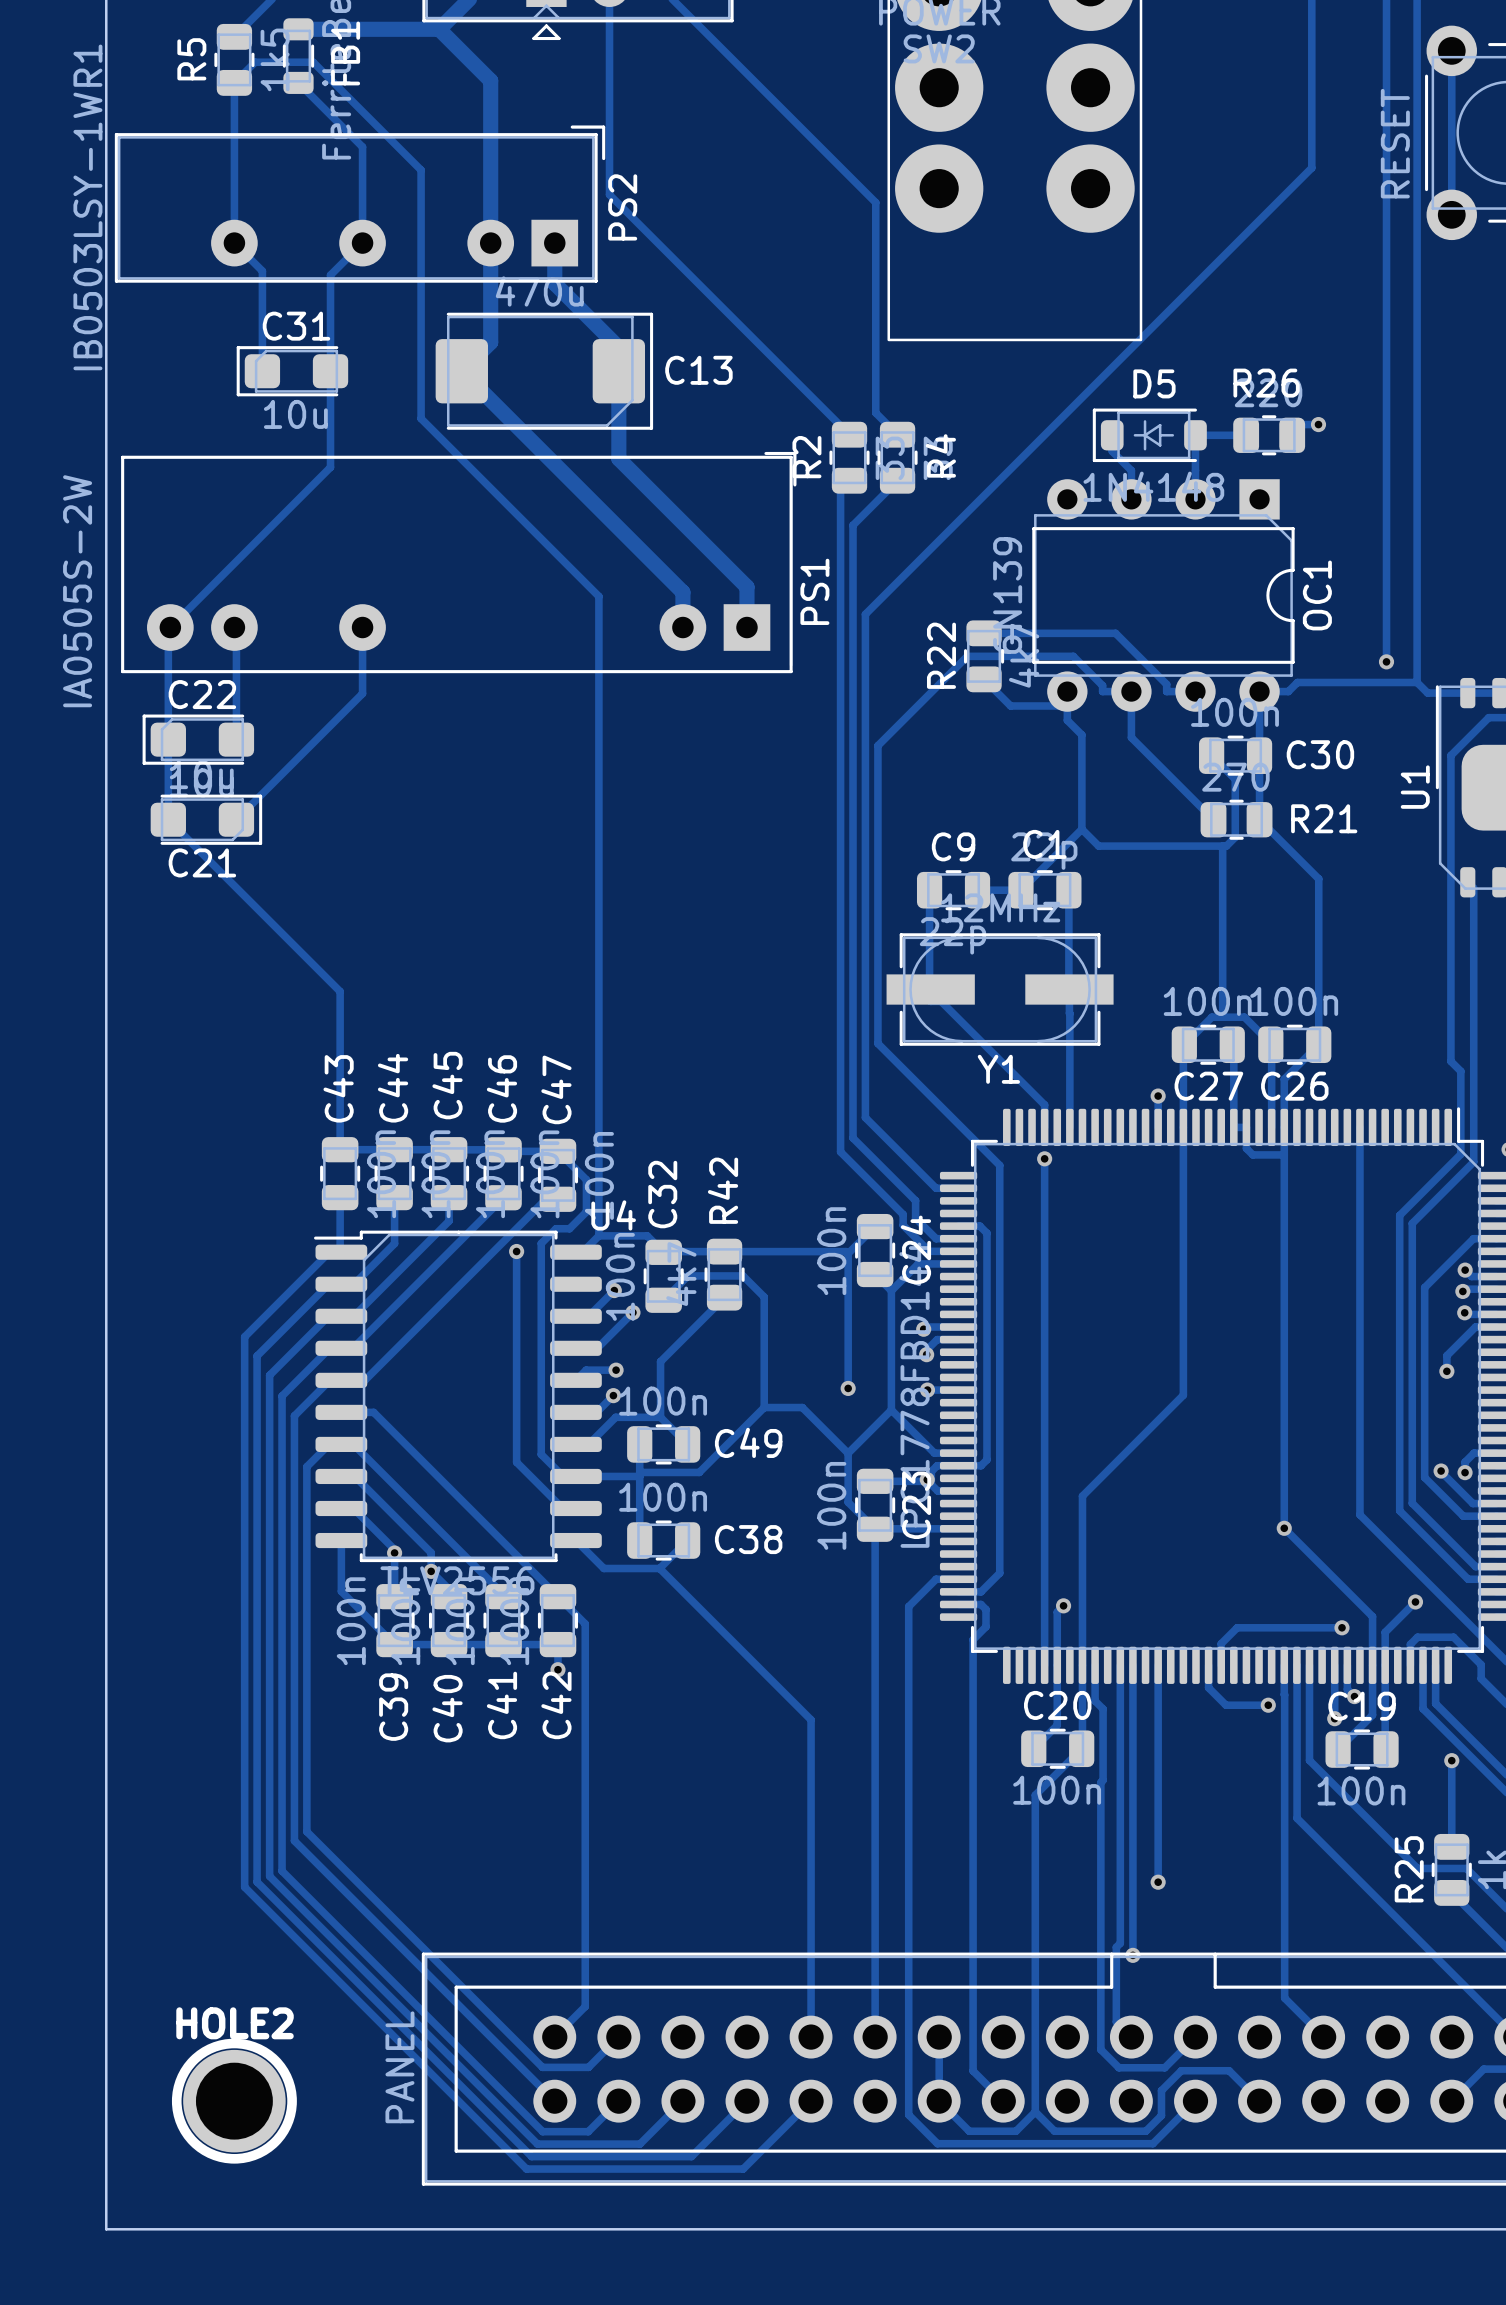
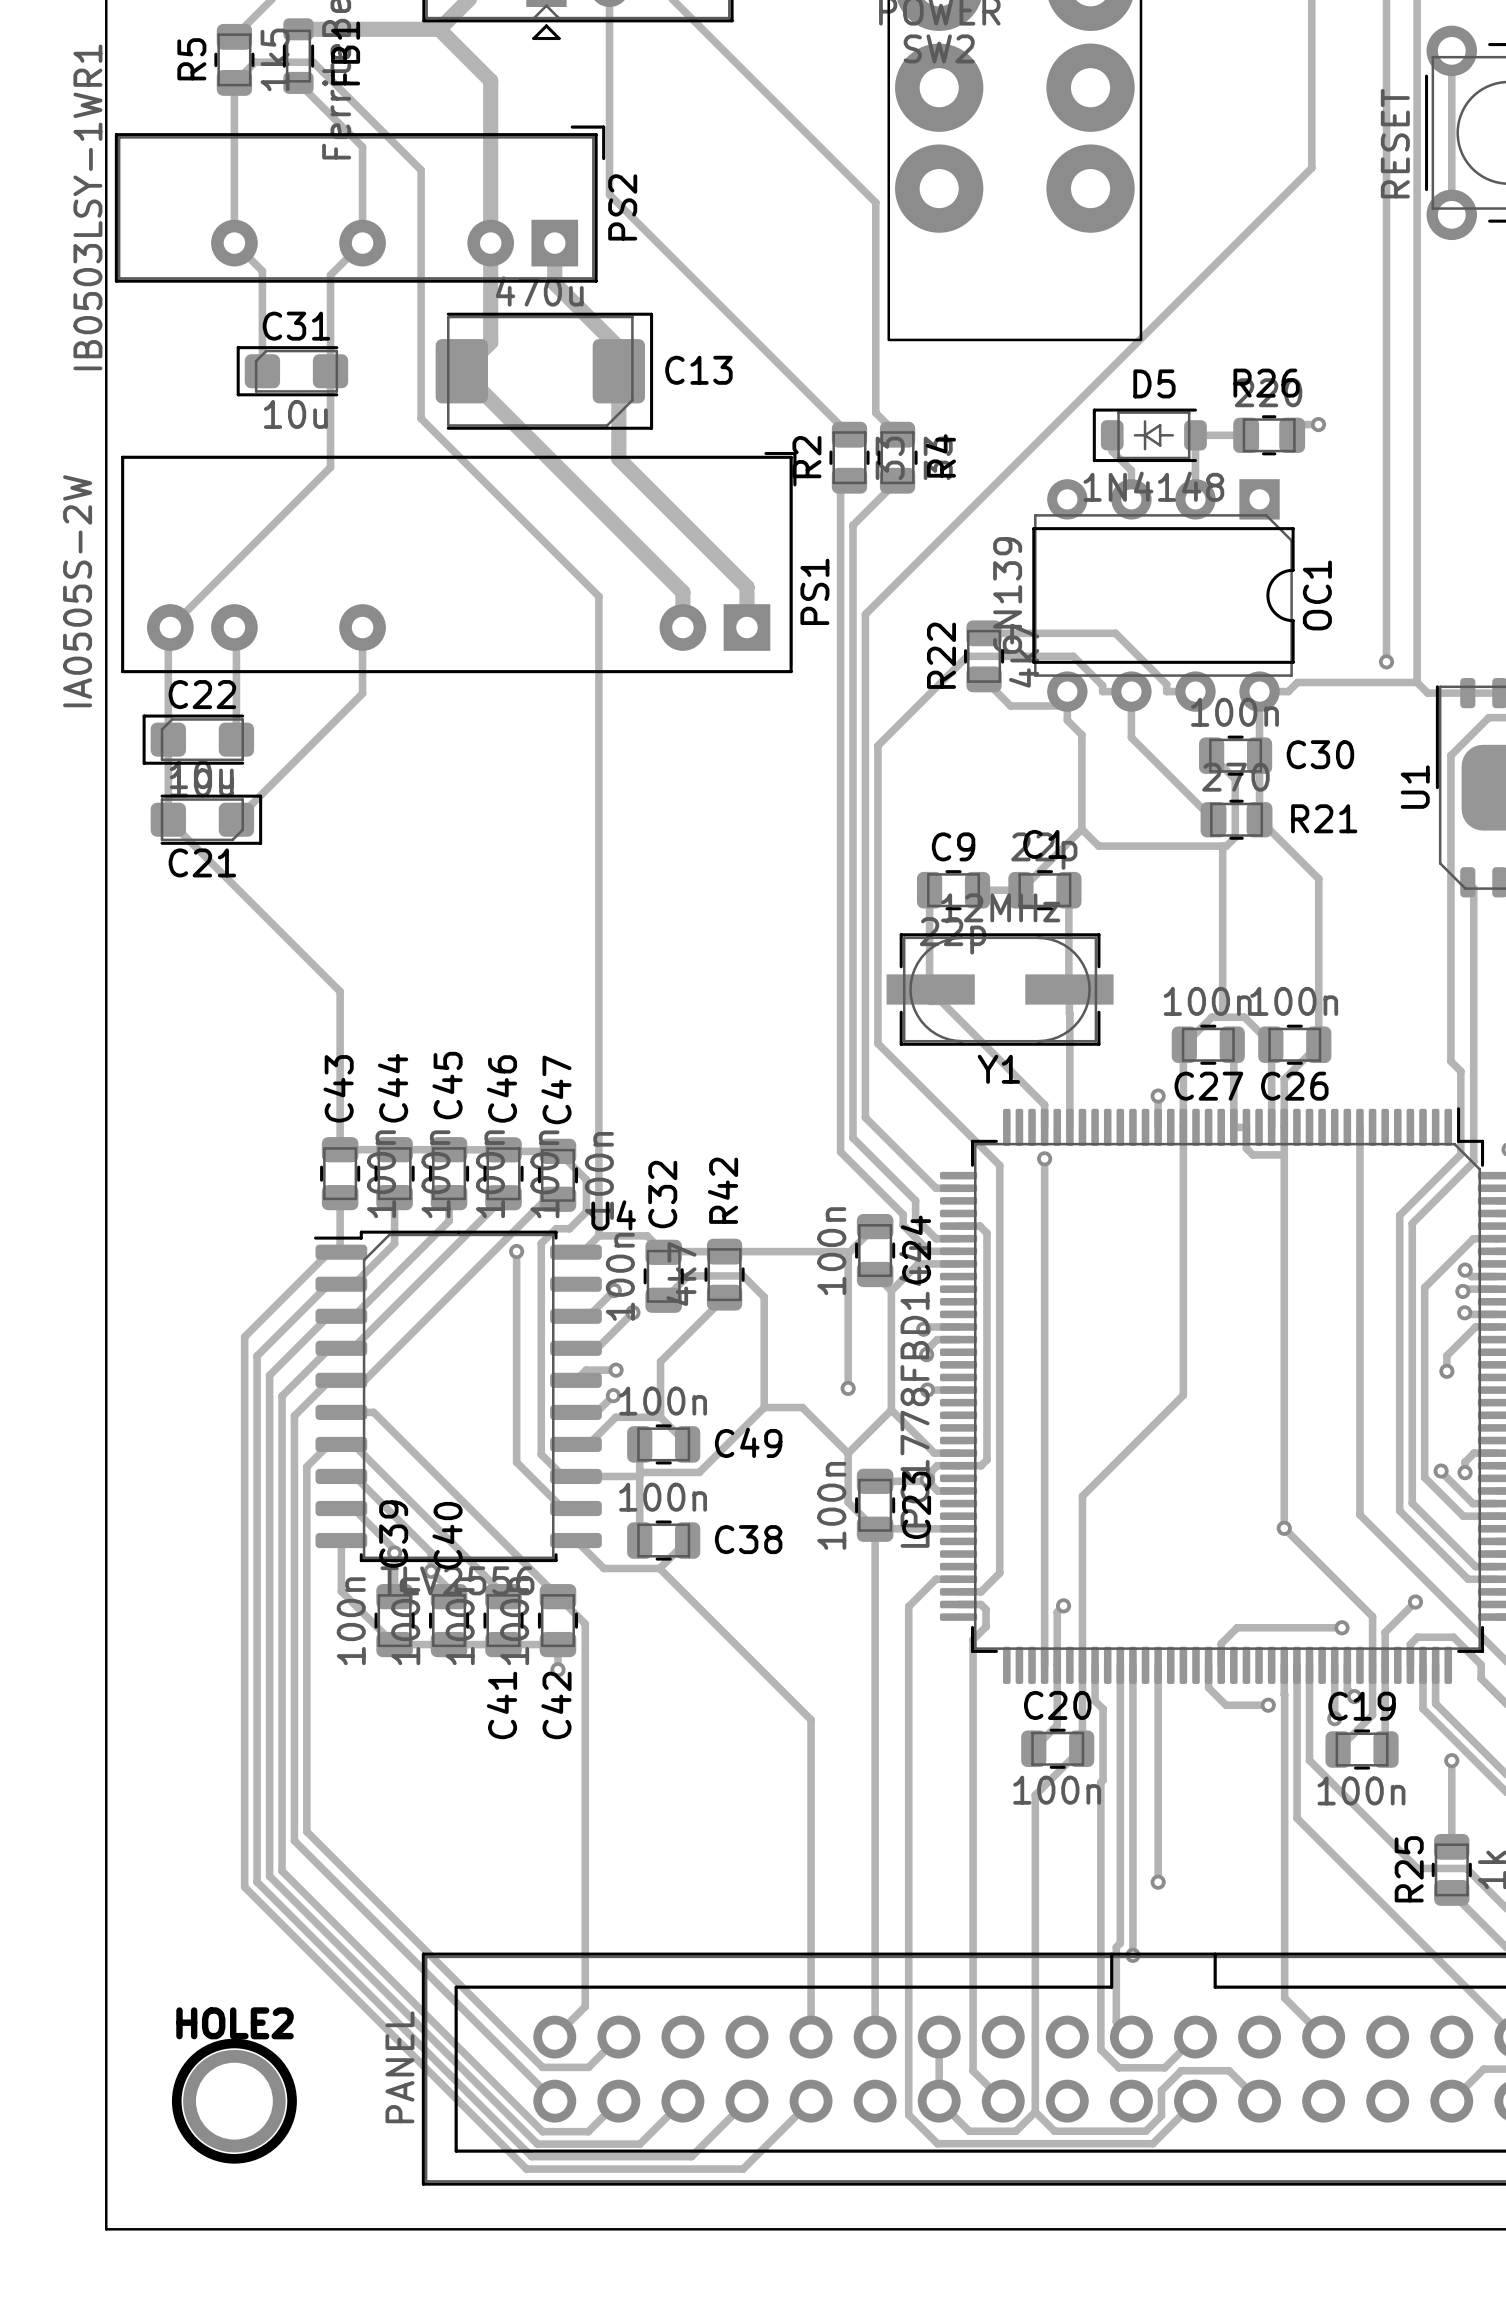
C39 name position: C39 (393, 1707) -> C39 (393, 1534)
C40 name position: C40 (447, 1708) -> C40 (447, 1535)

